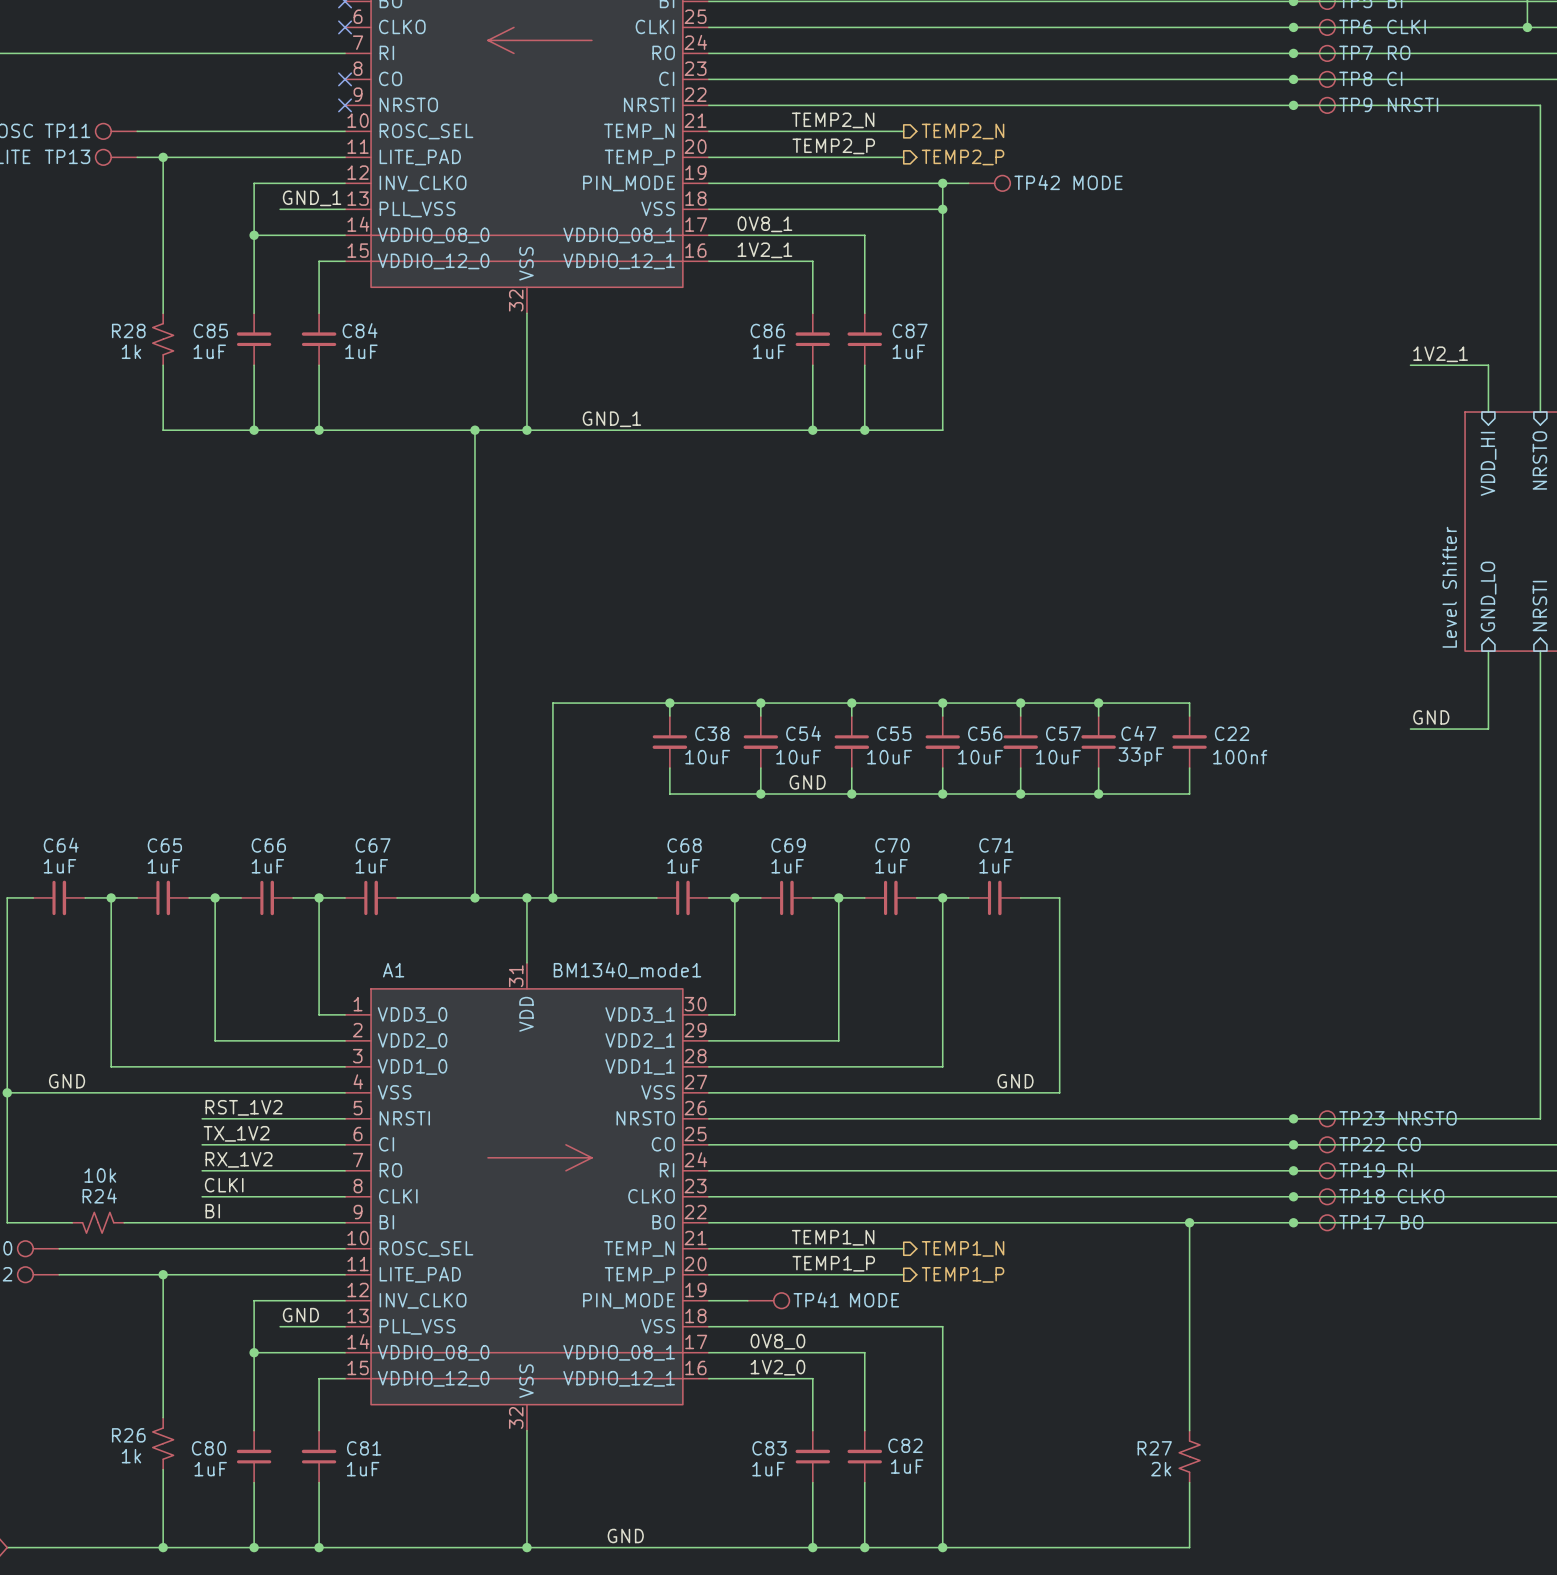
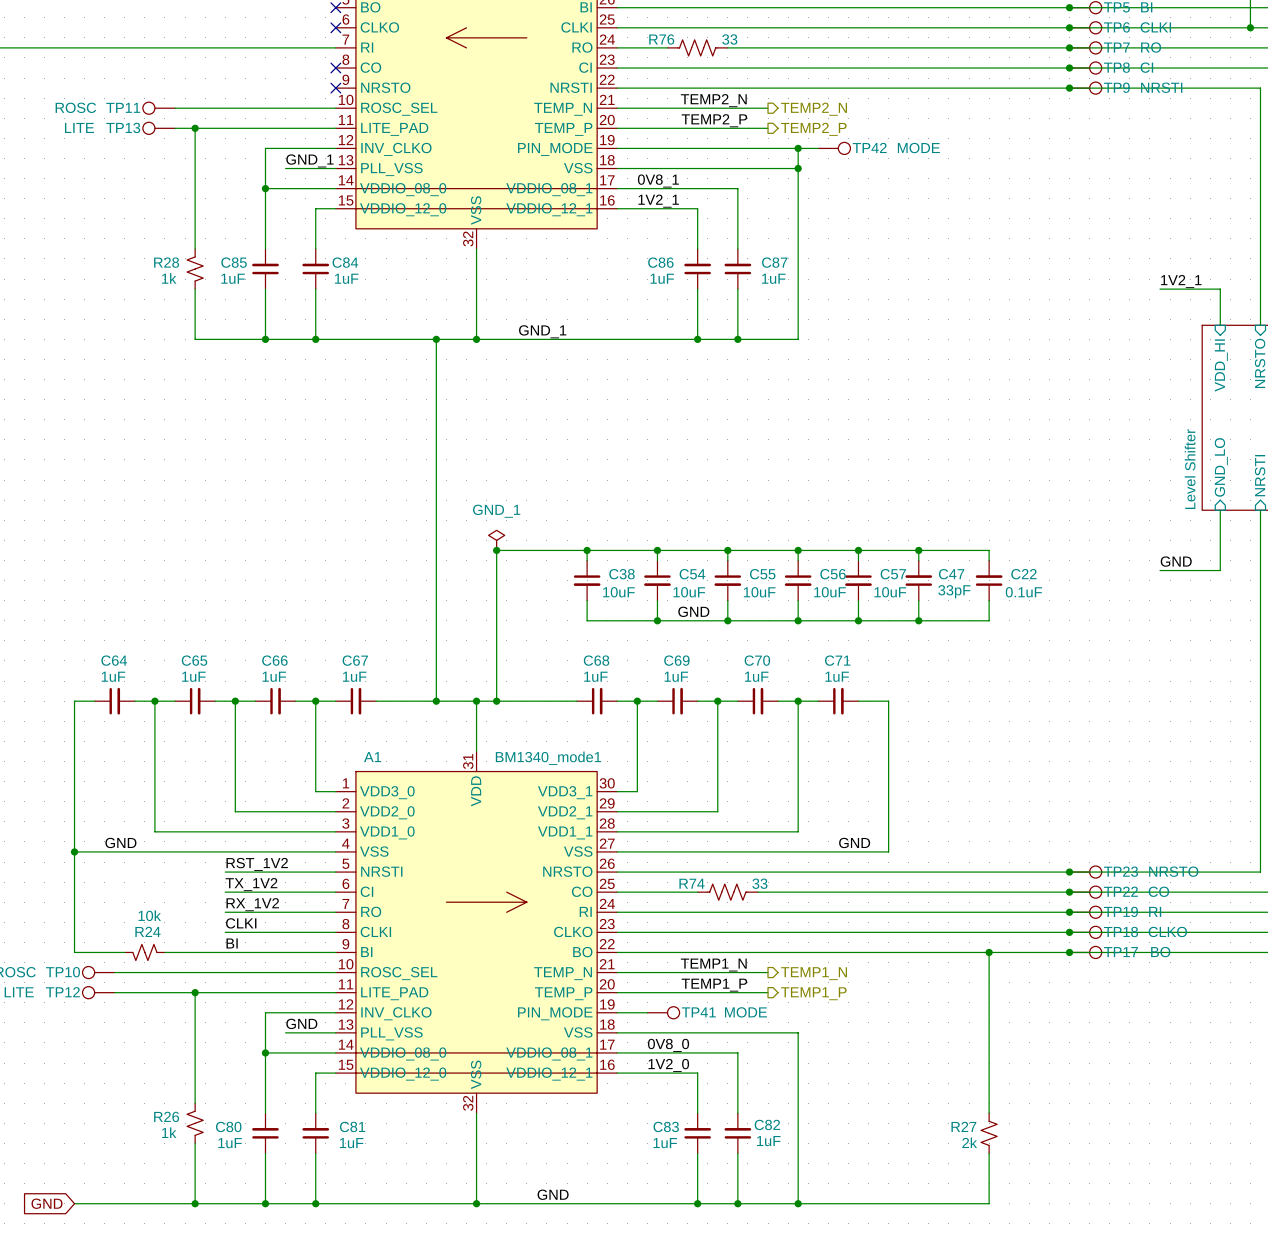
R76: none -> 33 (697, 47)
power symbol: none -> GND_1 (496, 540)
junction: none -> (496, 550)
C22 value: 100nf (1240, 757) -> 0.1uF (1023, 592)
R74: none -> 33 (727, 892)

